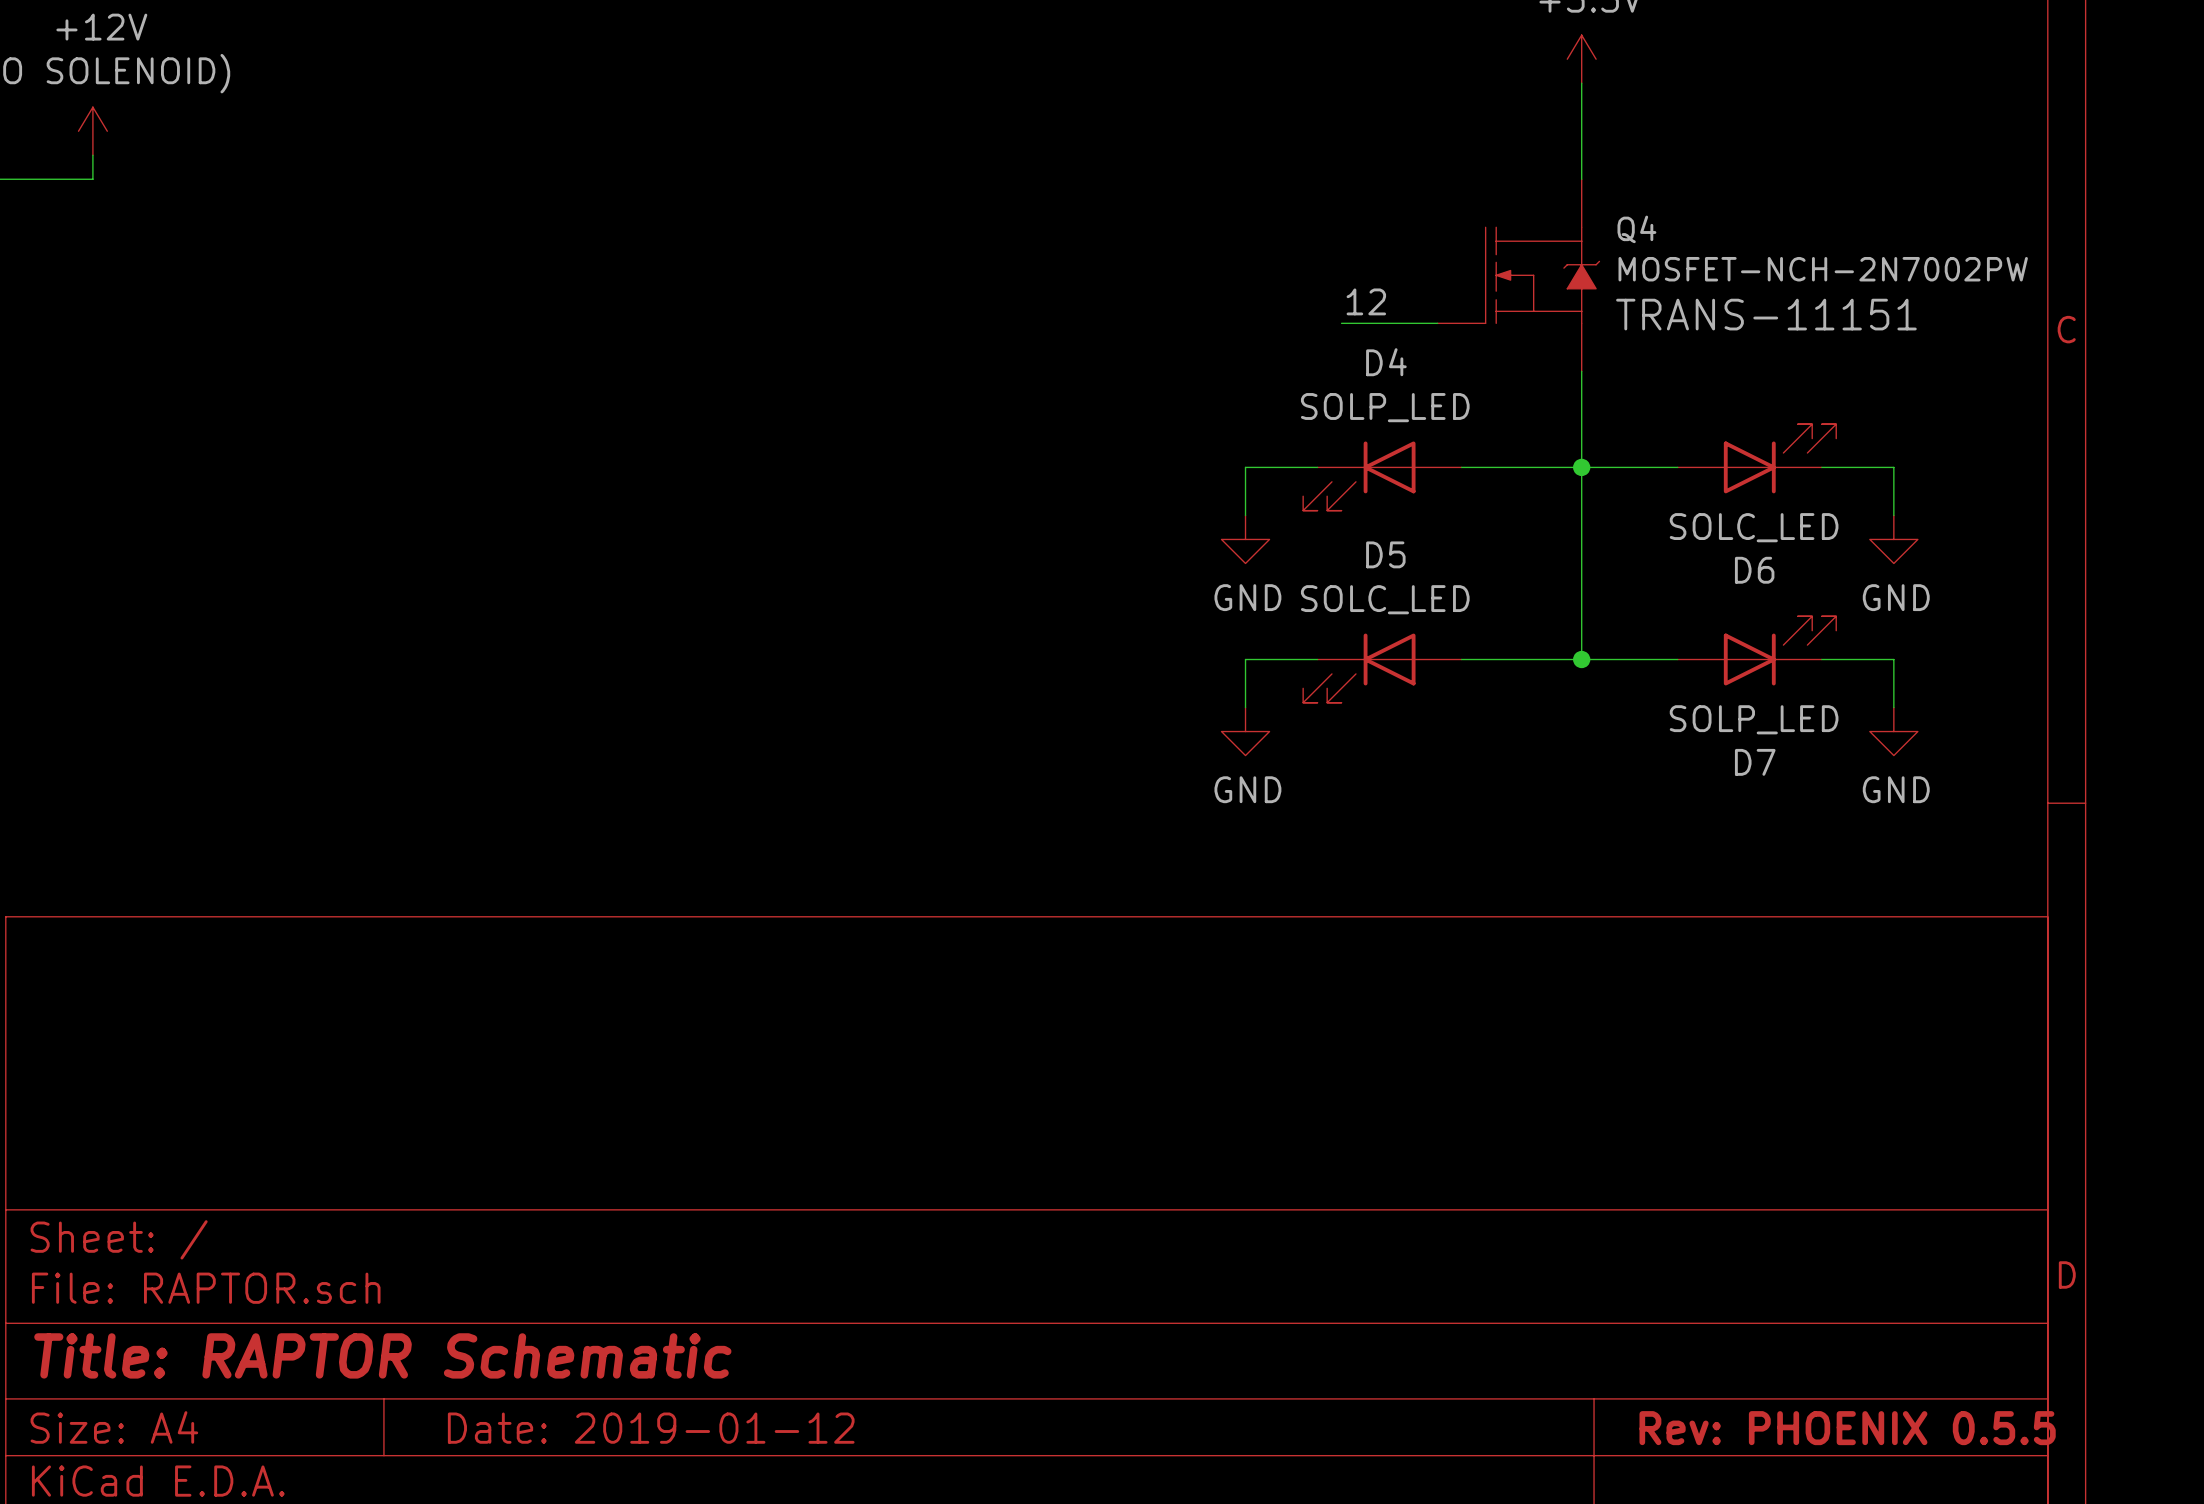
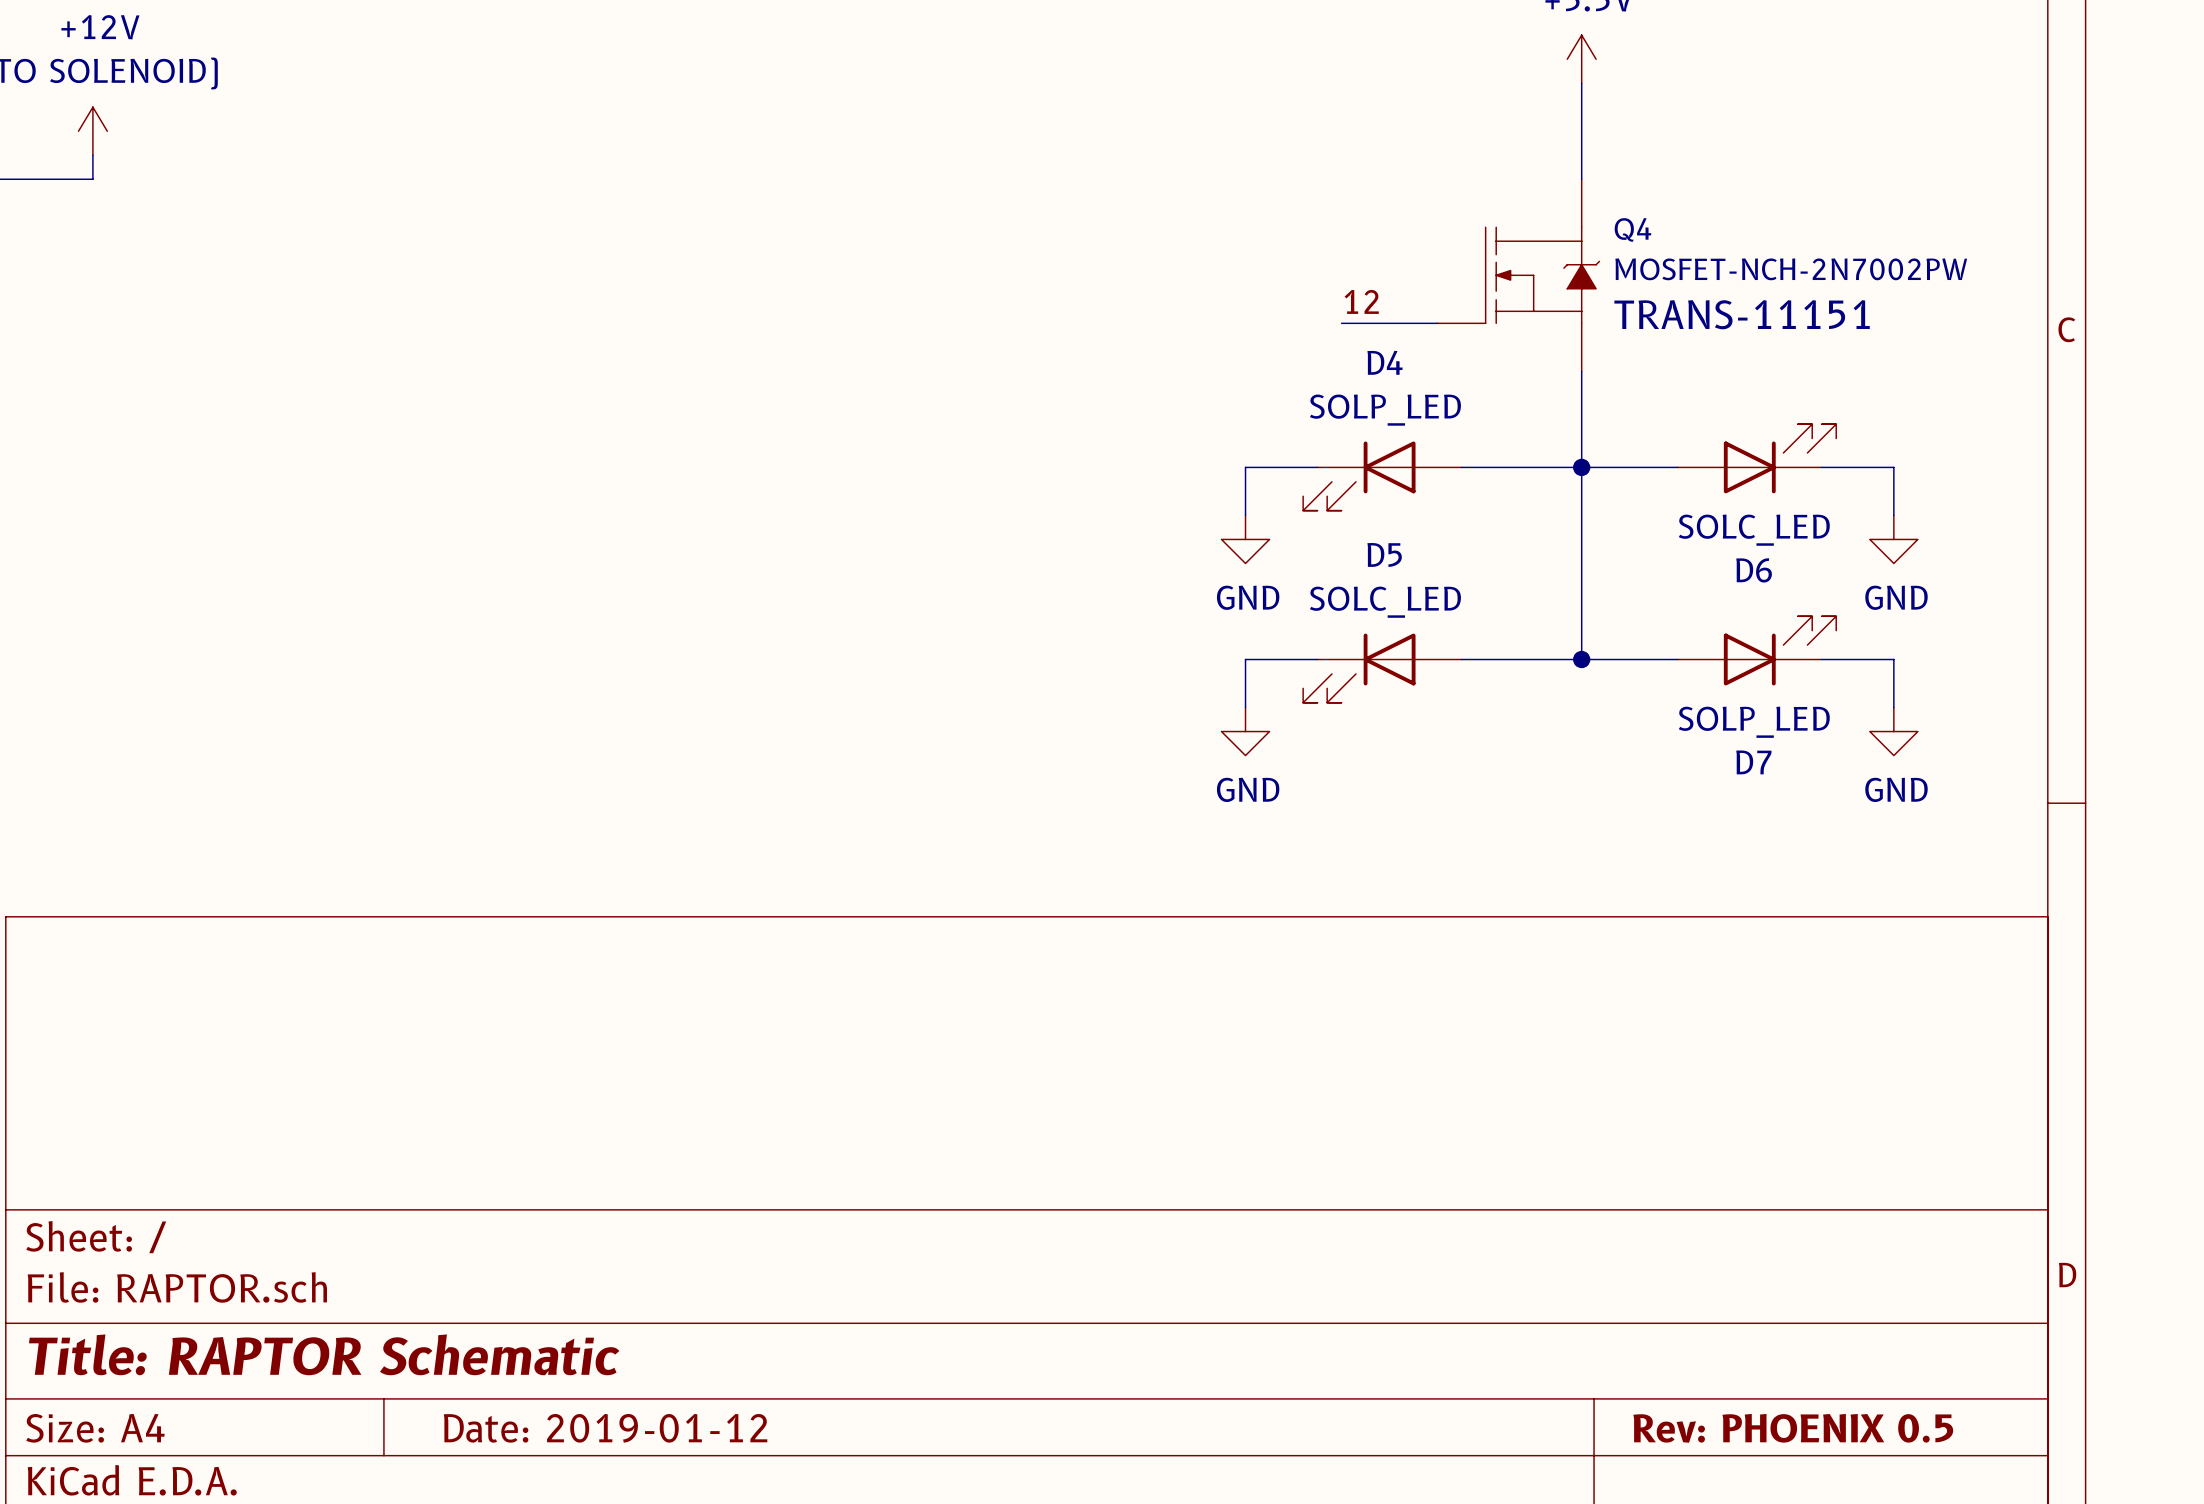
title block: Rev: PHOENIX 0.5.5 (1847, 1428) -> Rev: PHOENIX 0.5 (1793, 1428)

